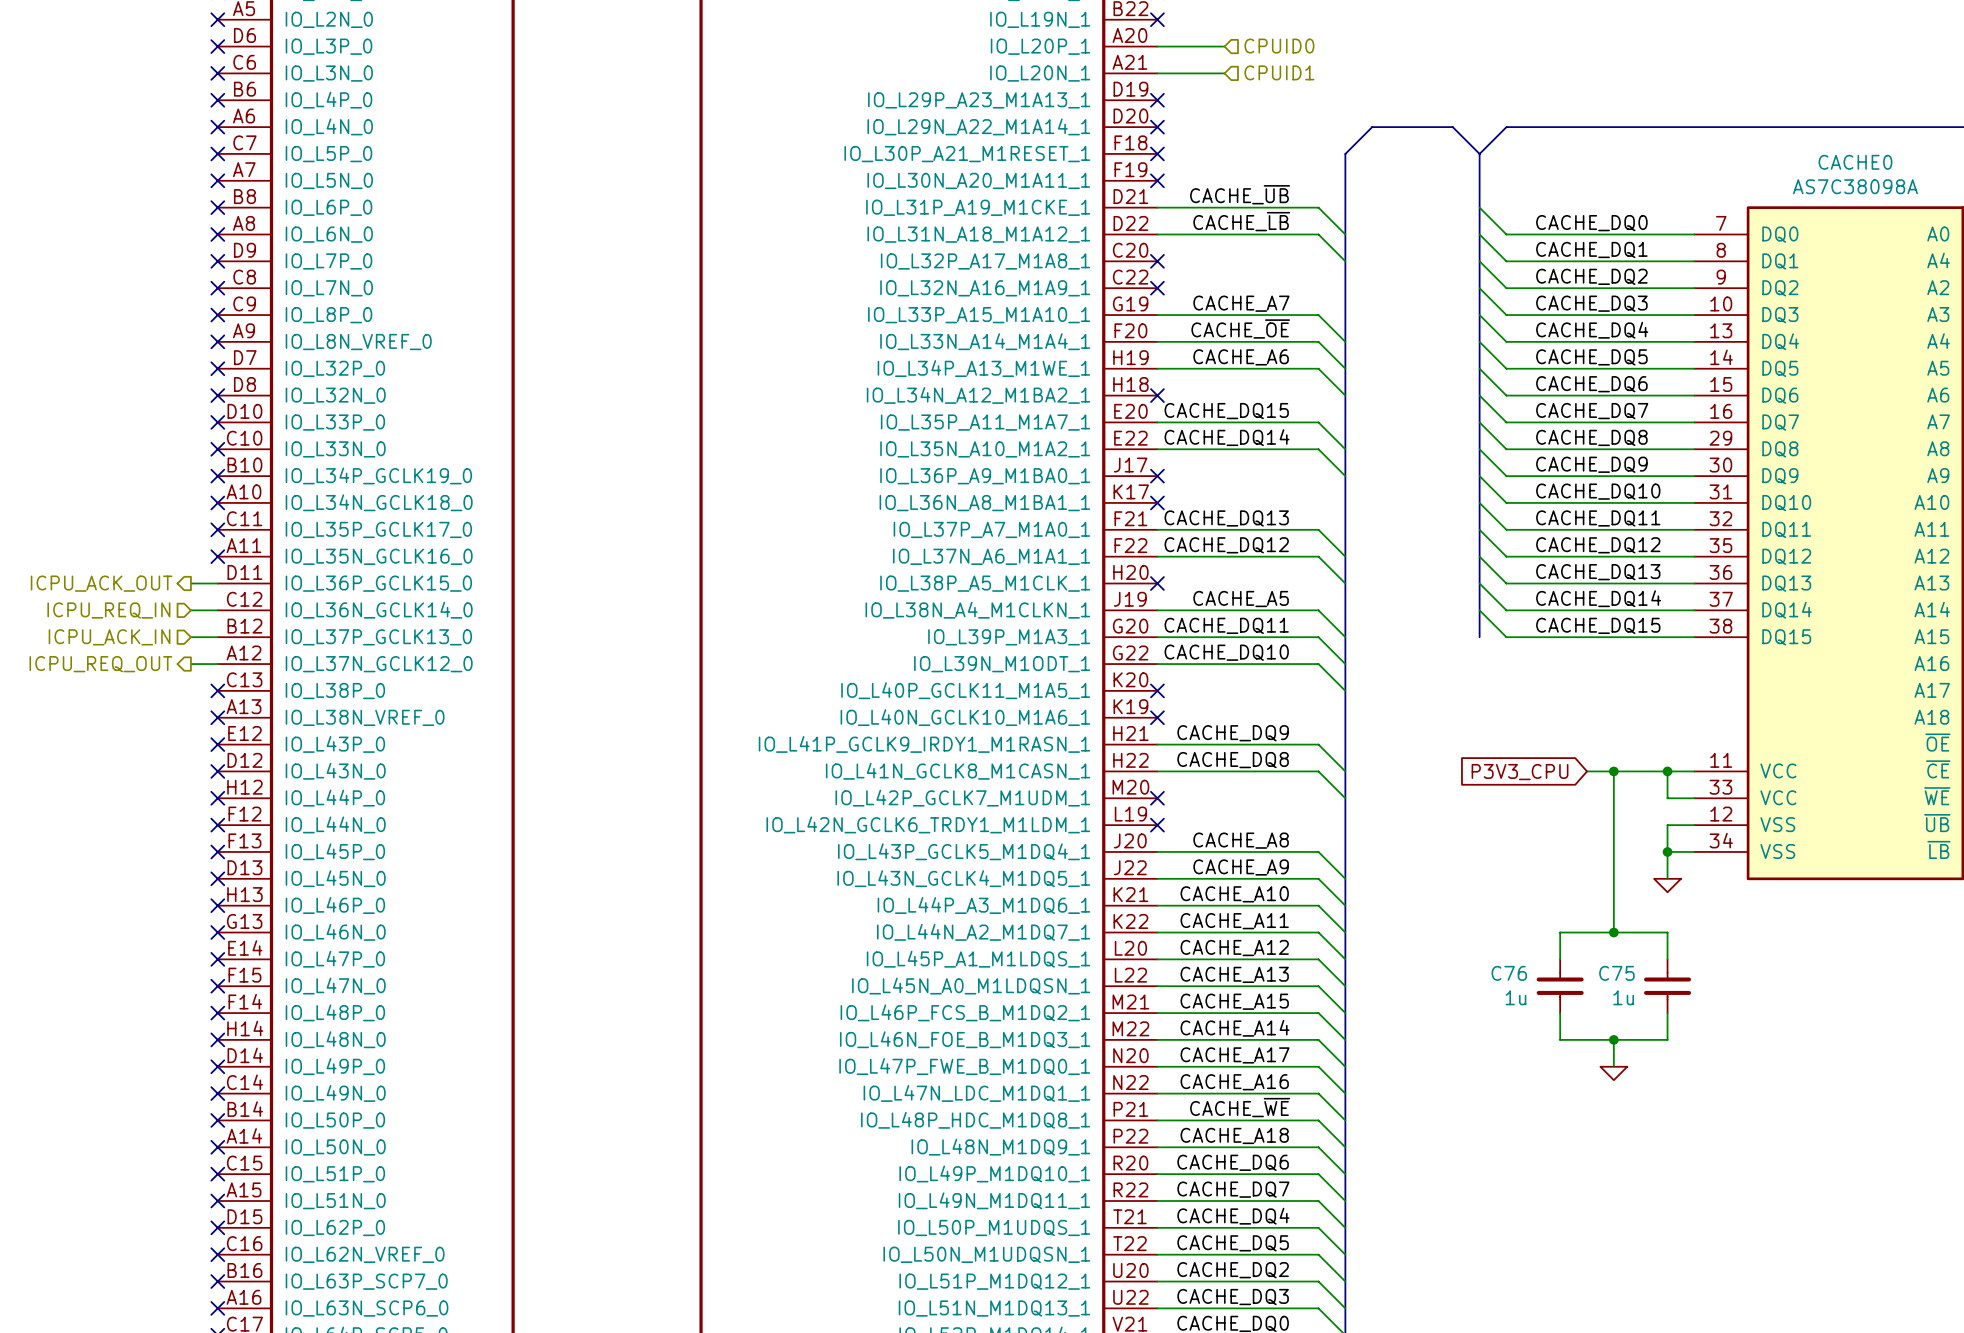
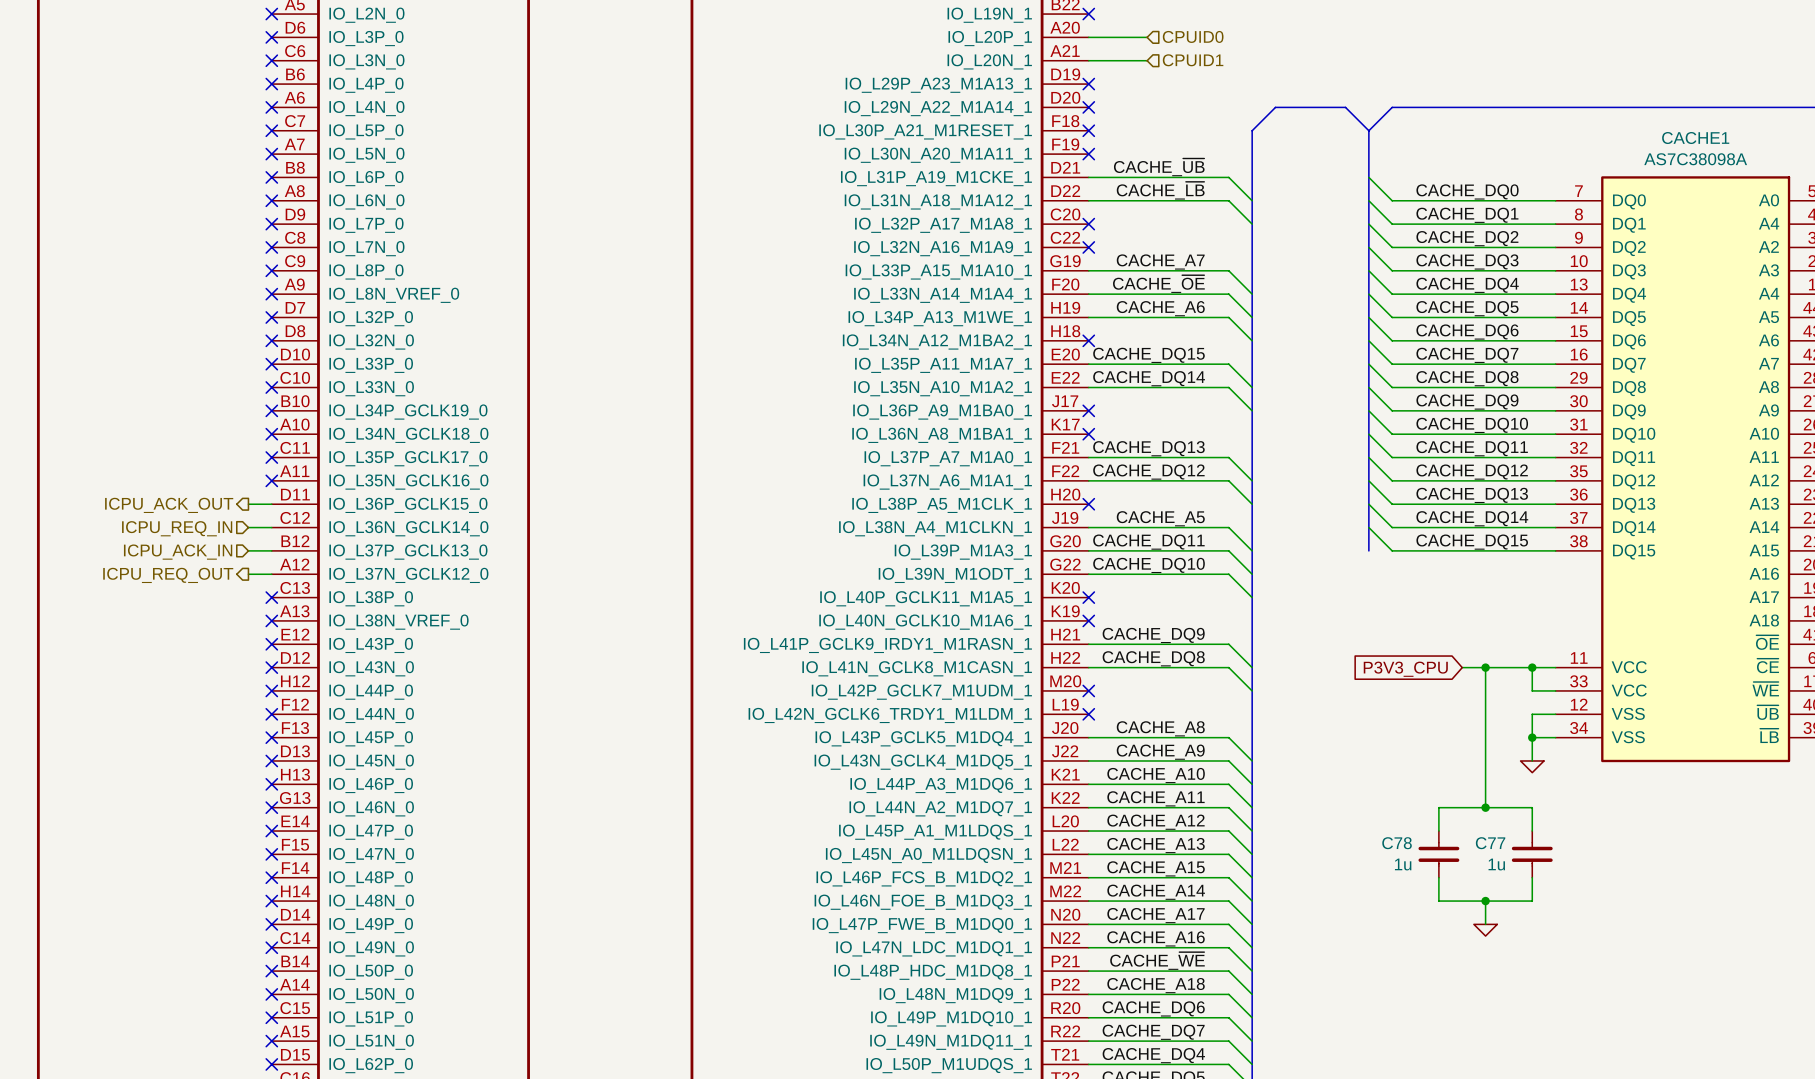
CACHE0 name: CACHE0 (1855, 162) -> CACHE1 (1695, 138)
C76 name: C76 (1509, 973) -> C78 (1397, 843)
C75 name: C75 (1616, 973) -> C77 (1490, 843)

